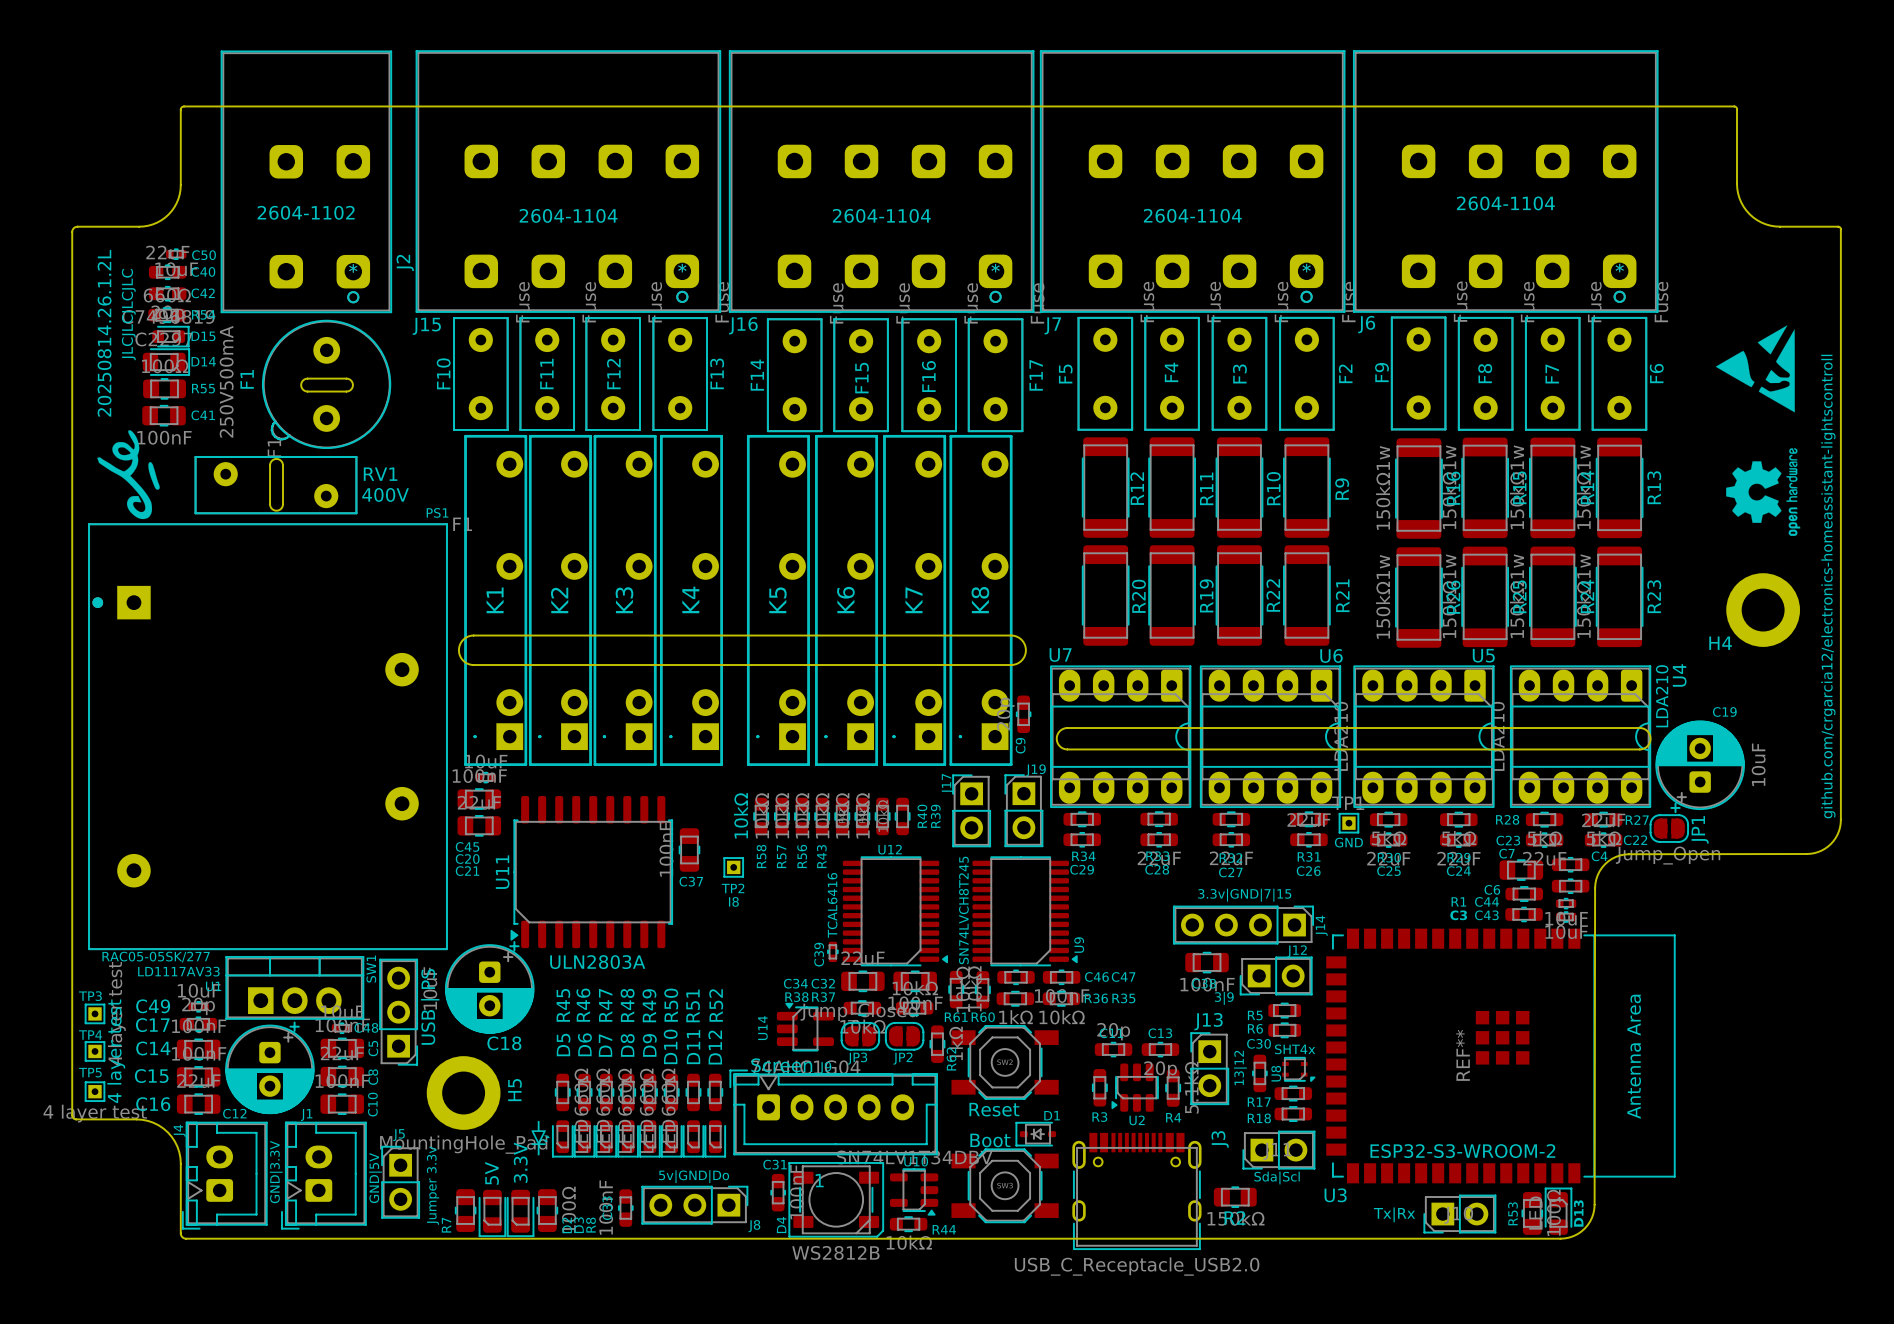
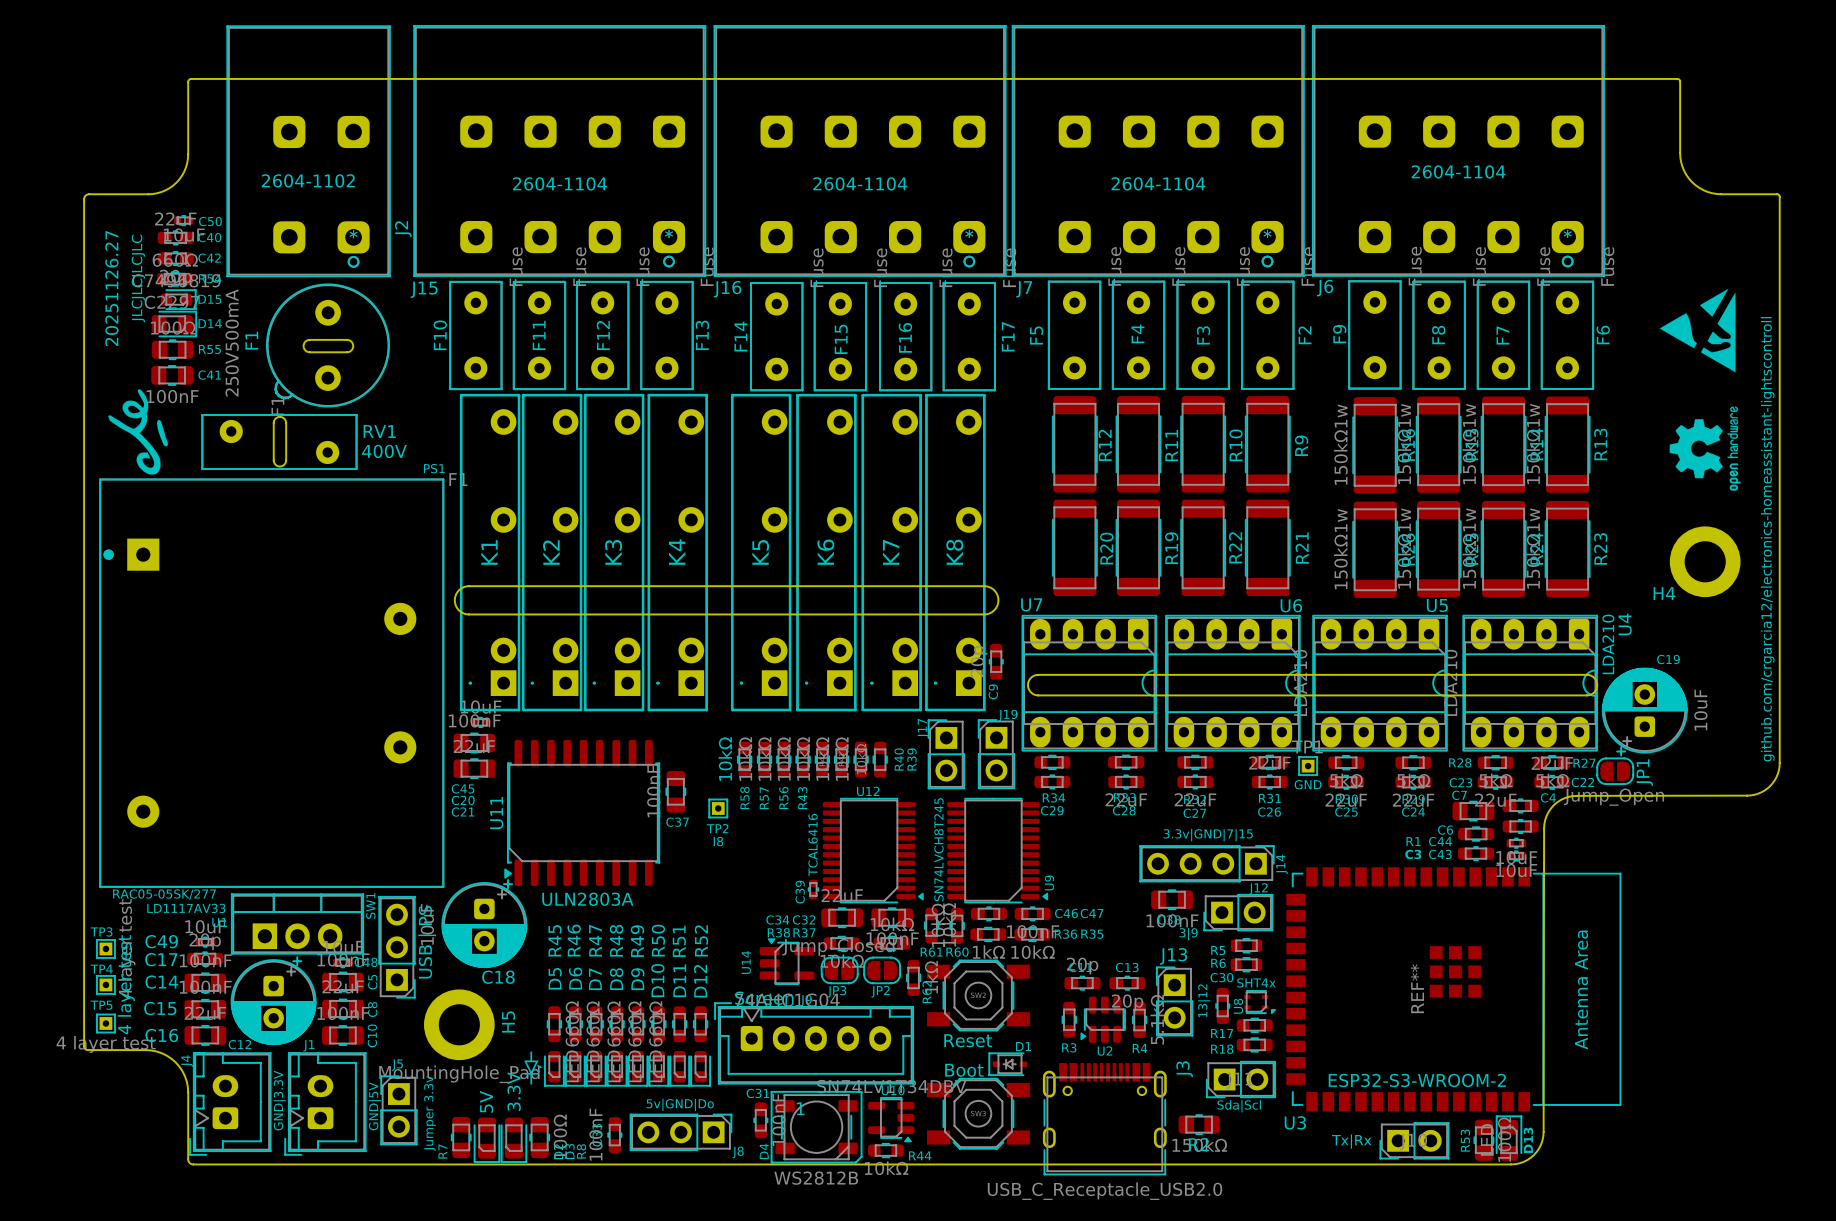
text: 20250814.26.1.2L (104, 333) -> 20251126.27 (111, 288)

